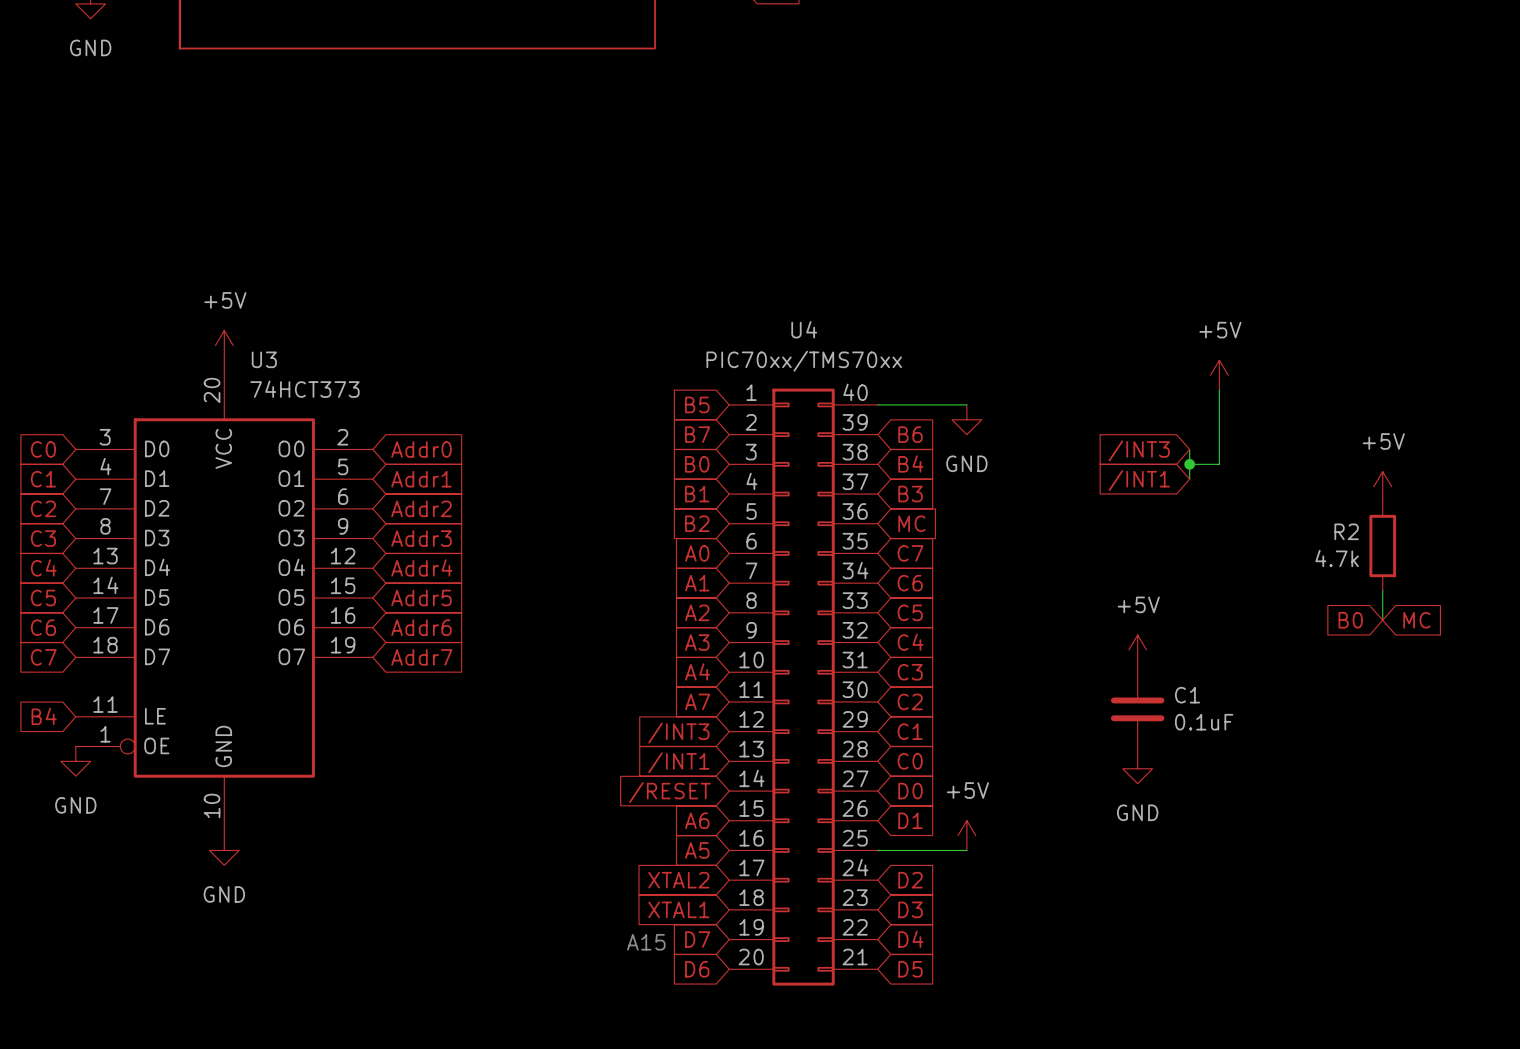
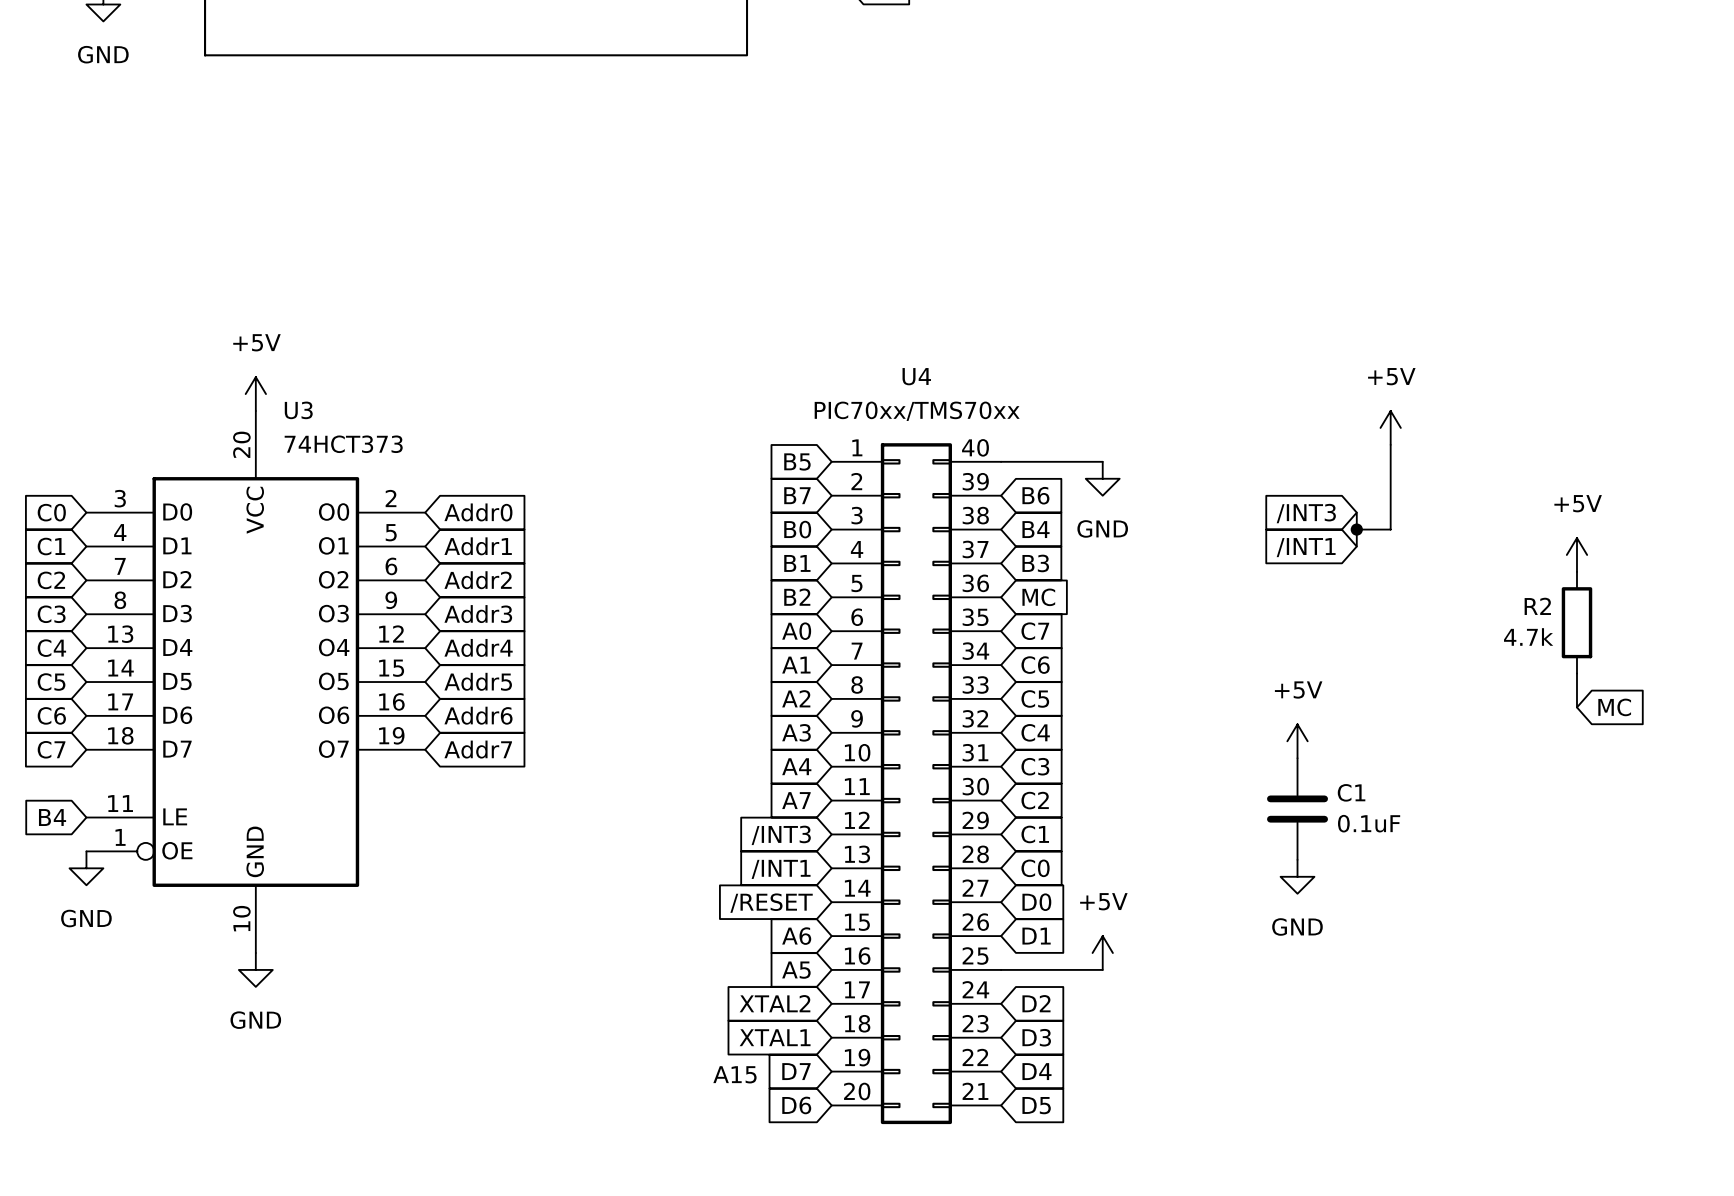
global label: B0 (1350, 620) -> none

